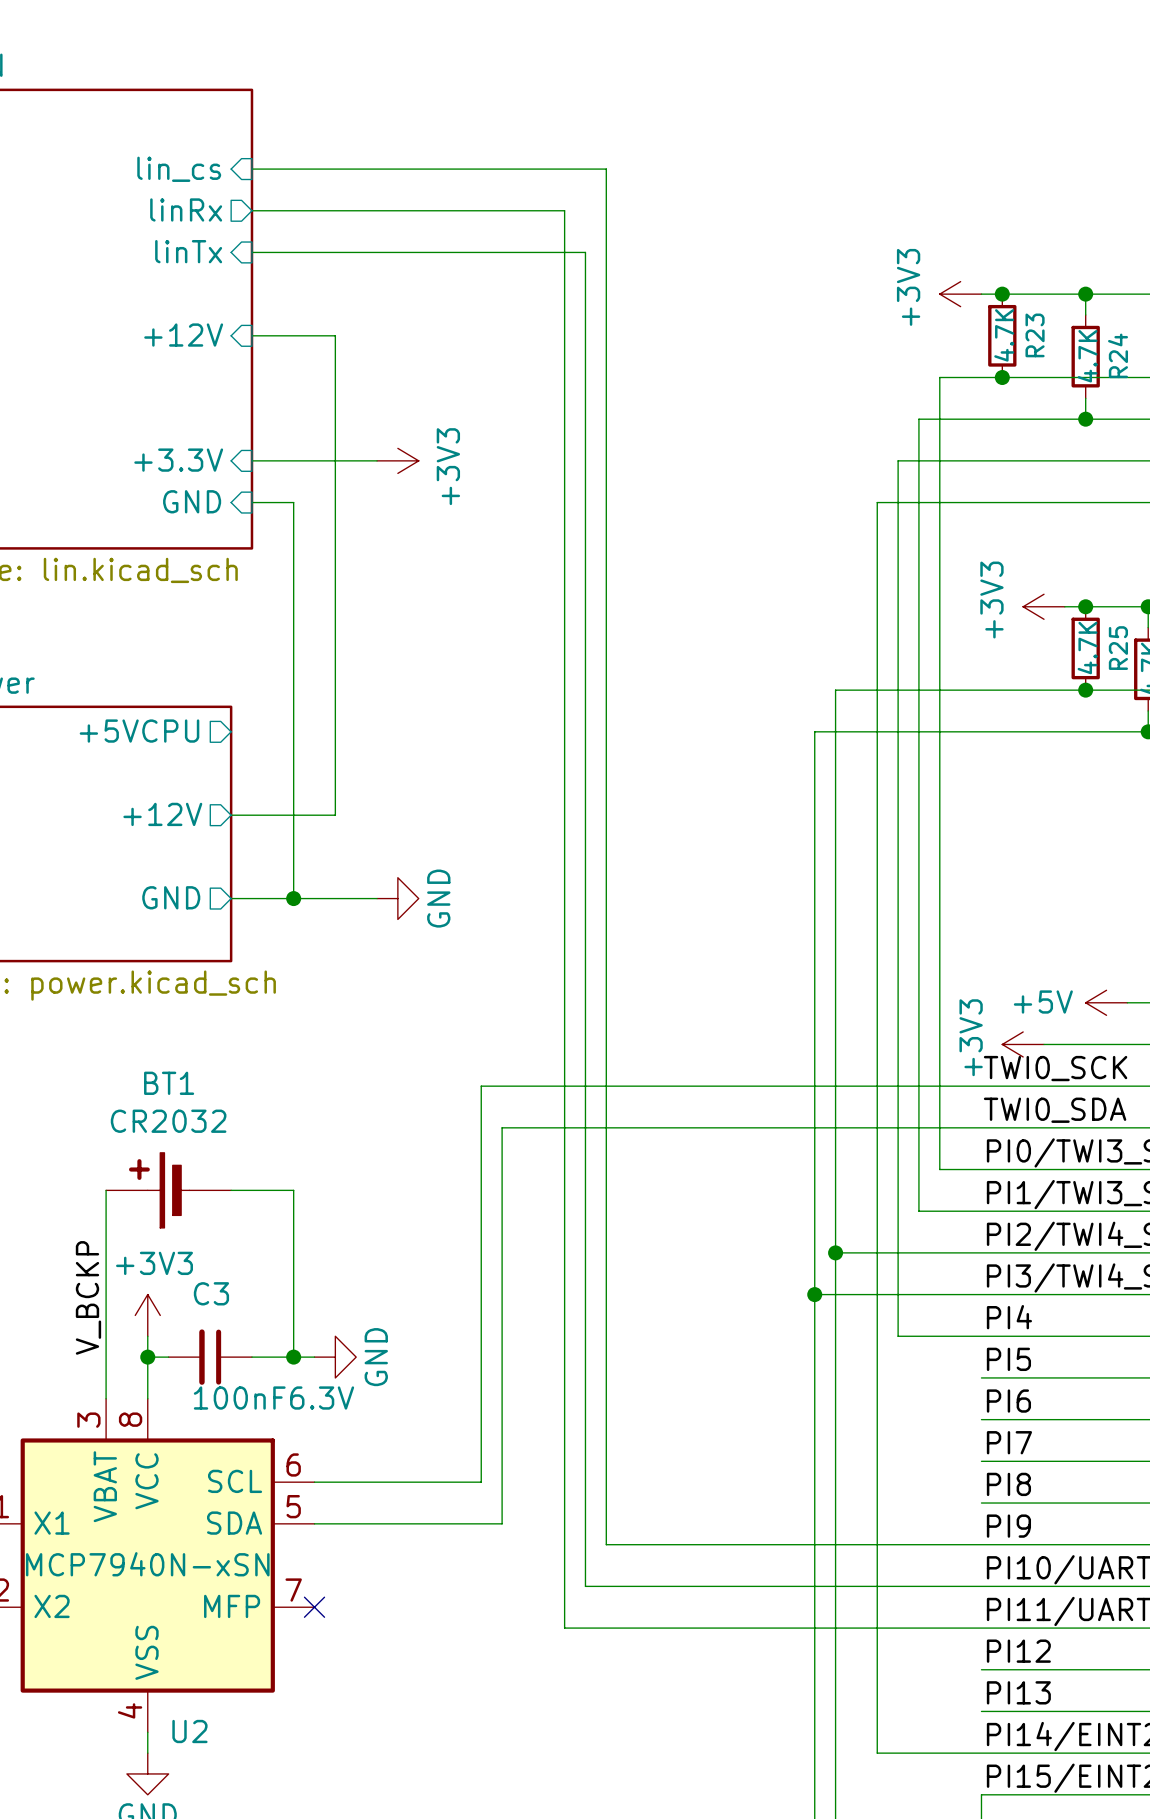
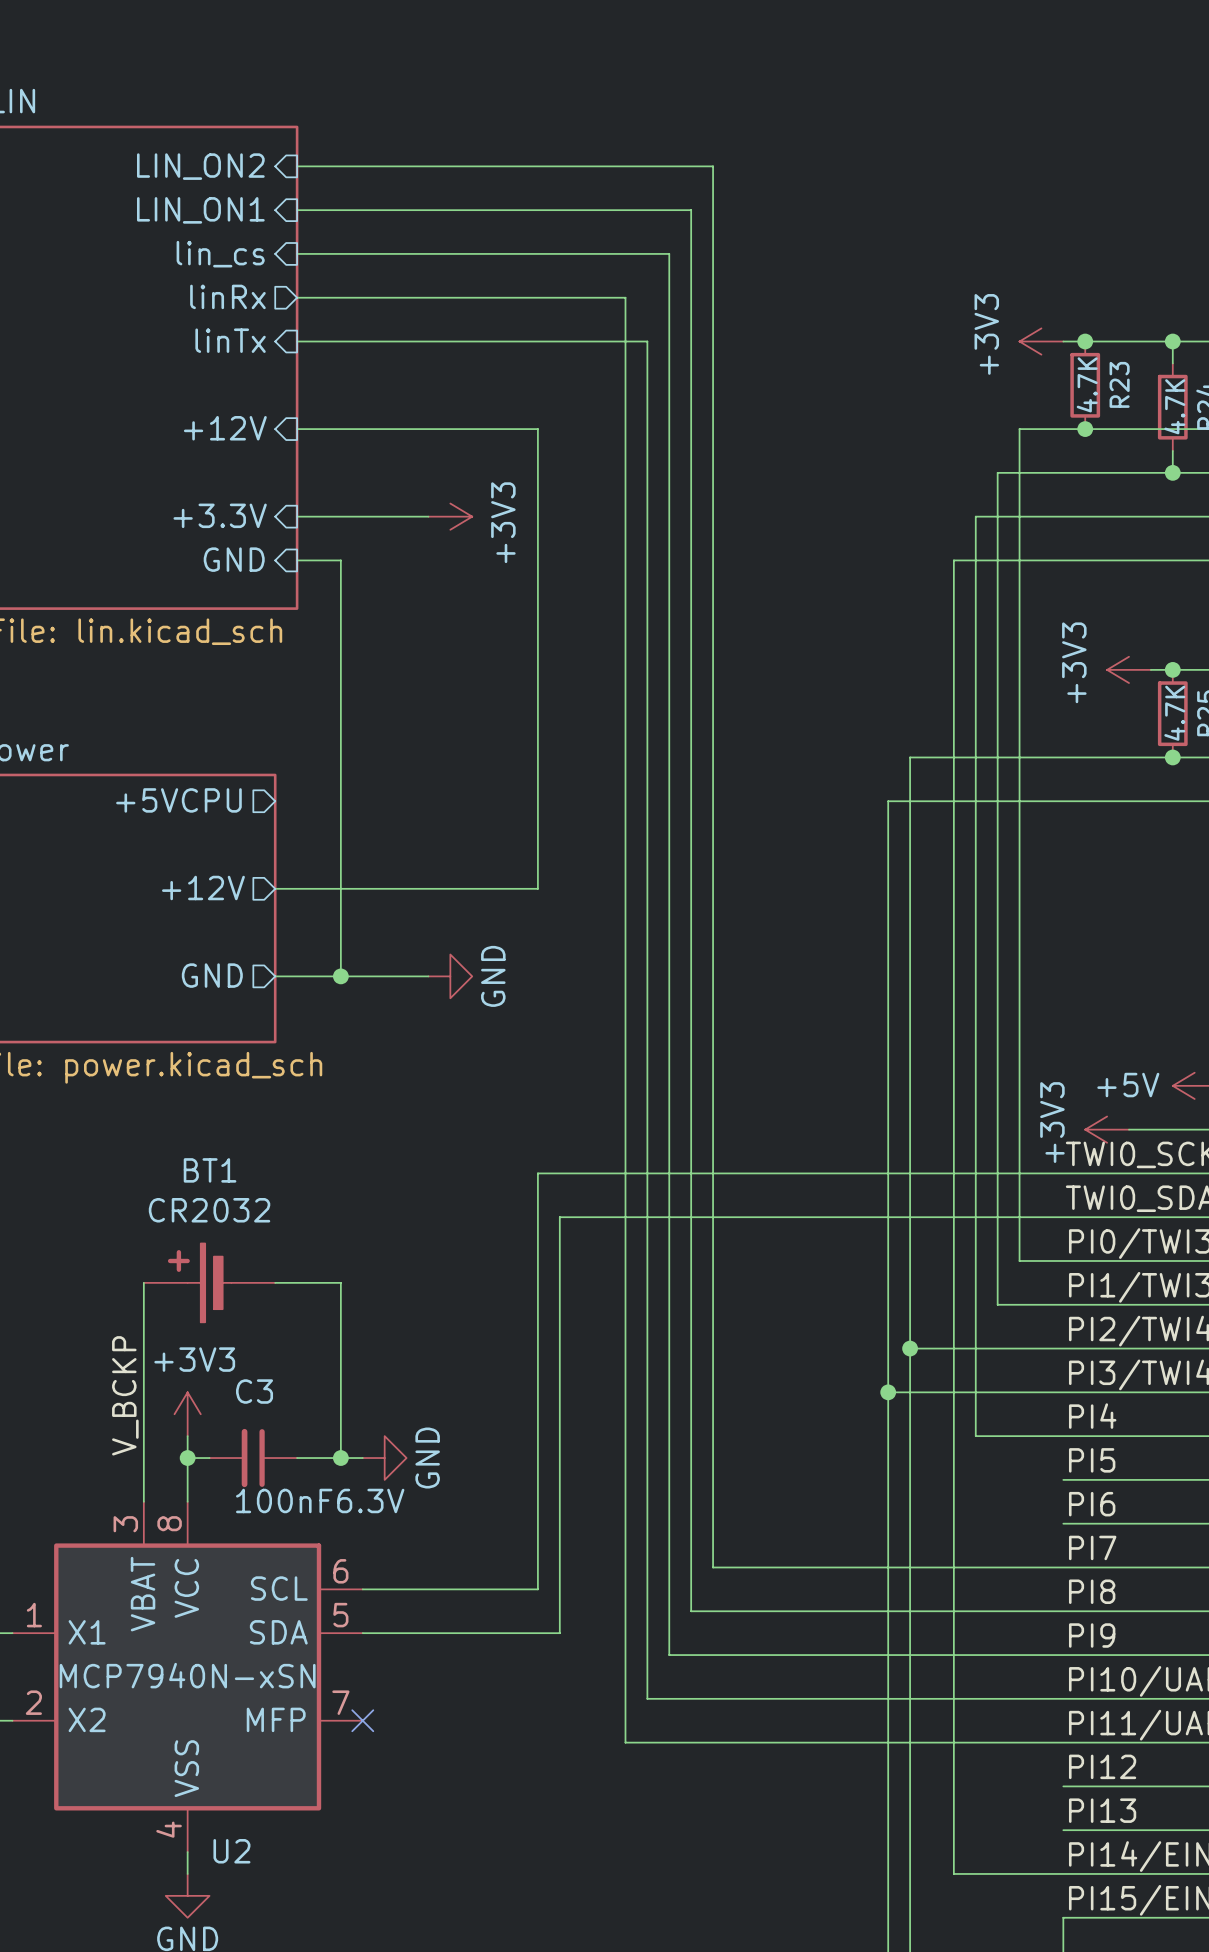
sheet pin: none -> LIN_ON2 (200, 166)
wire: none -> (297, 166) (713, 166) (713, 1567) (1063, 1567)
sheet pin: lin_cs (179, 169) -> LIN_ON1 (200, 210)
wire: (606, 169) (606, 210) -> (625, 253) (669, 253)
wire: none -> (669, 210) (691, 210) (691, 1611) (1063, 1611)
sheet pin shape: output (186, 209) -> input (220, 254)
sheet pin: linRx (186, 209) -> lin_cs (220, 254)
wire: (564, 210) (564, 252) (585, 252) (585, 294) -> (297, 341) (647, 341)
sheet pin shape: input (188, 251) -> output (227, 296)
sheet pin: linTx (188, 251) -> linRx (227, 296)
sheet pin: none -> linTx (230, 340)
sheet pin position: +12V (183, 335) -> +12V (225, 428)
wire: (251, 335) (335, 335) (335, 815) -> (297, 429) (537, 429) (537, 888) (384, 888)

